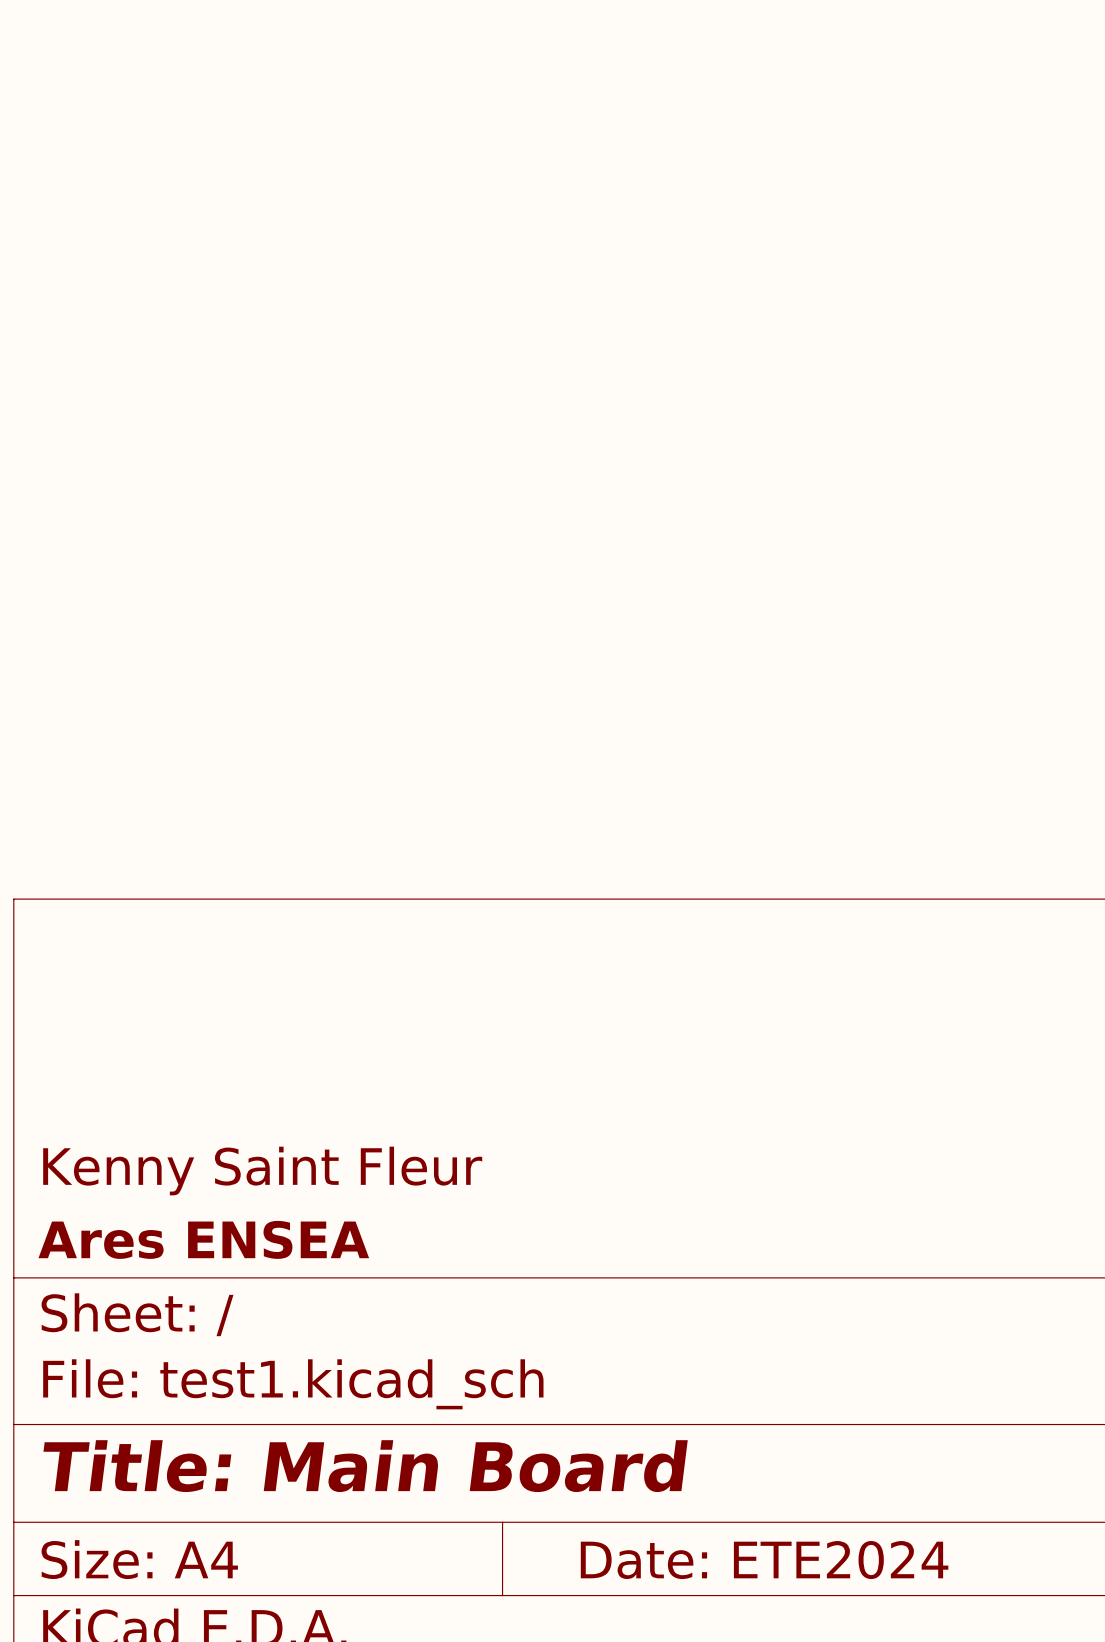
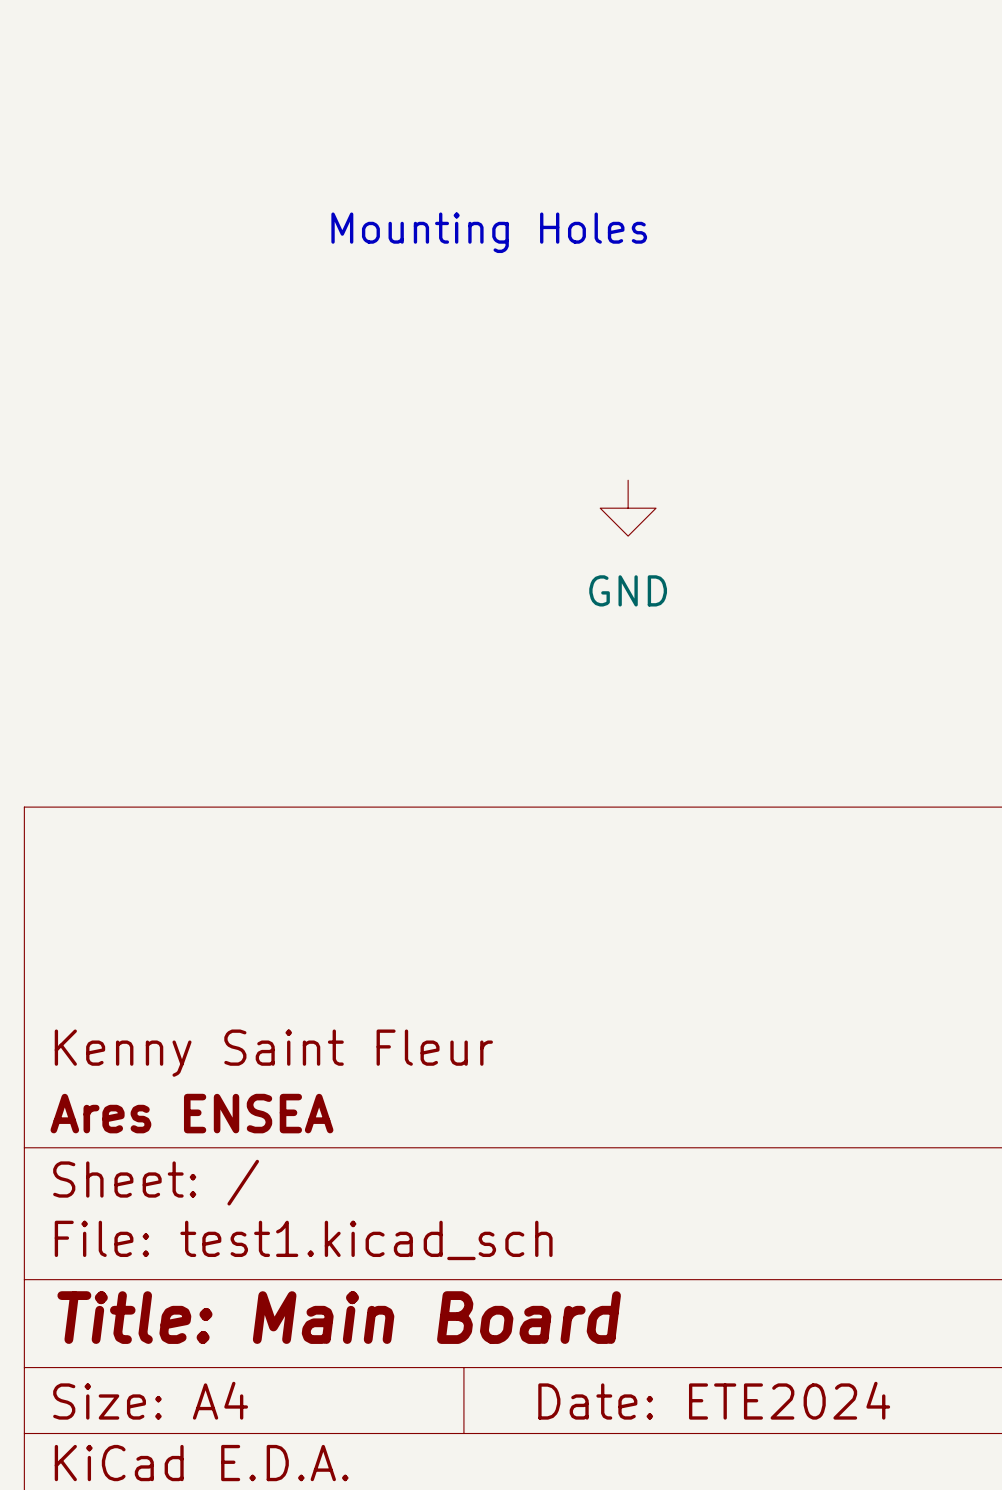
text: none -> Mounting Holes (489, 232)
power symbol: none -> GND (628, 508)

